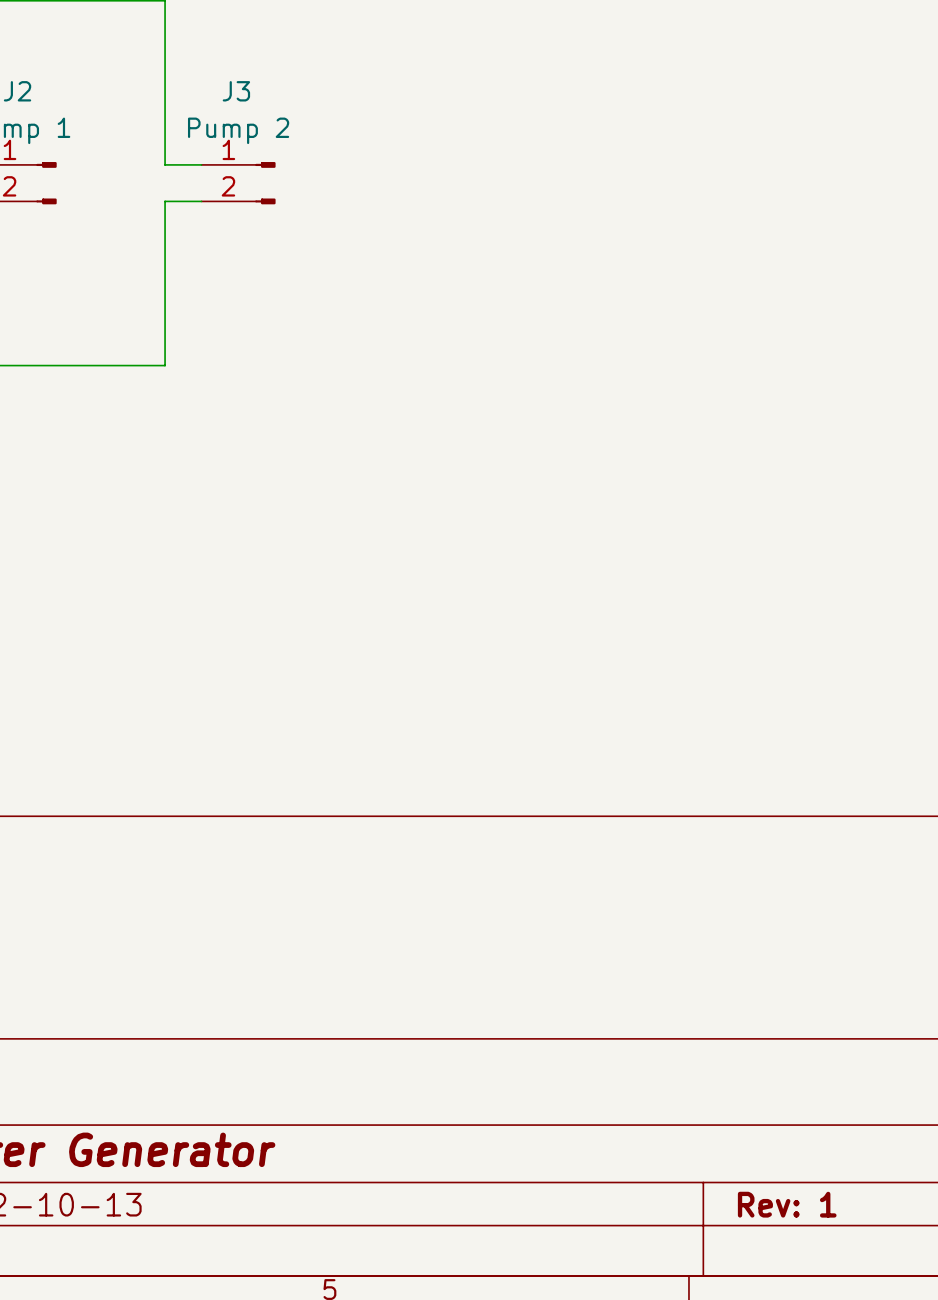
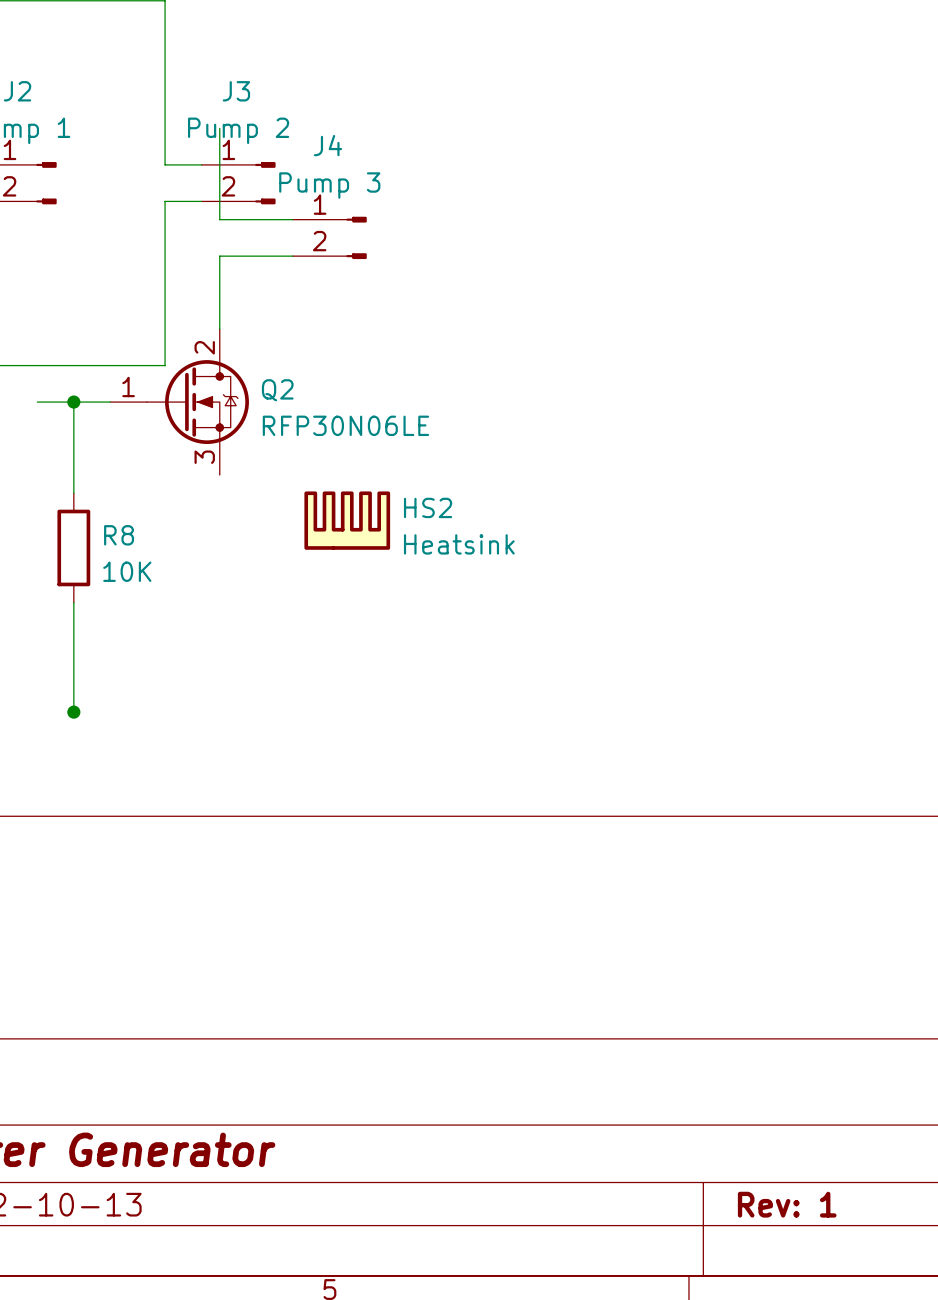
wire: none -> (219, 128) (219, 219) (292, 219)
J4: none -> Pump 3 (329, 237)
wire: none -> (292, 256) (219, 256) (219, 329)
wire: none -> (37, 402) (110, 402)
wire: none -> (73, 402) (73, 493)
junction: none -> (73, 402)
Q2: none -> RFP30N06LE (179, 402)
HS2: none -> Heatsink (347, 520)
R8: none -> 10K (73, 547)
wire: none -> (73, 602) (73, 712)
junction: none -> (73, 712)

